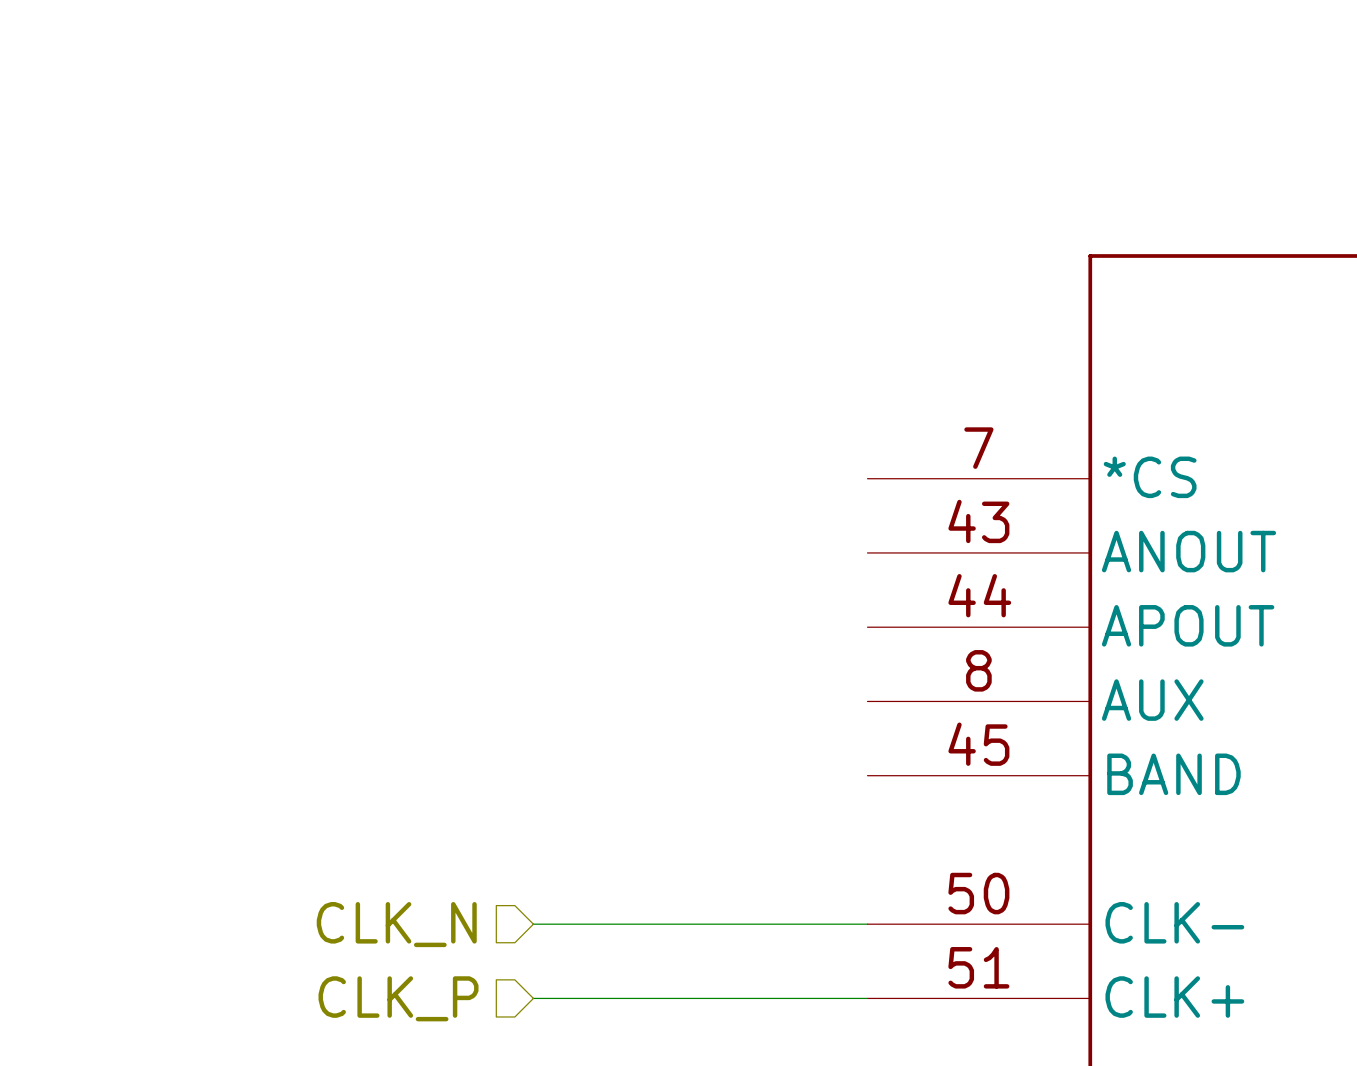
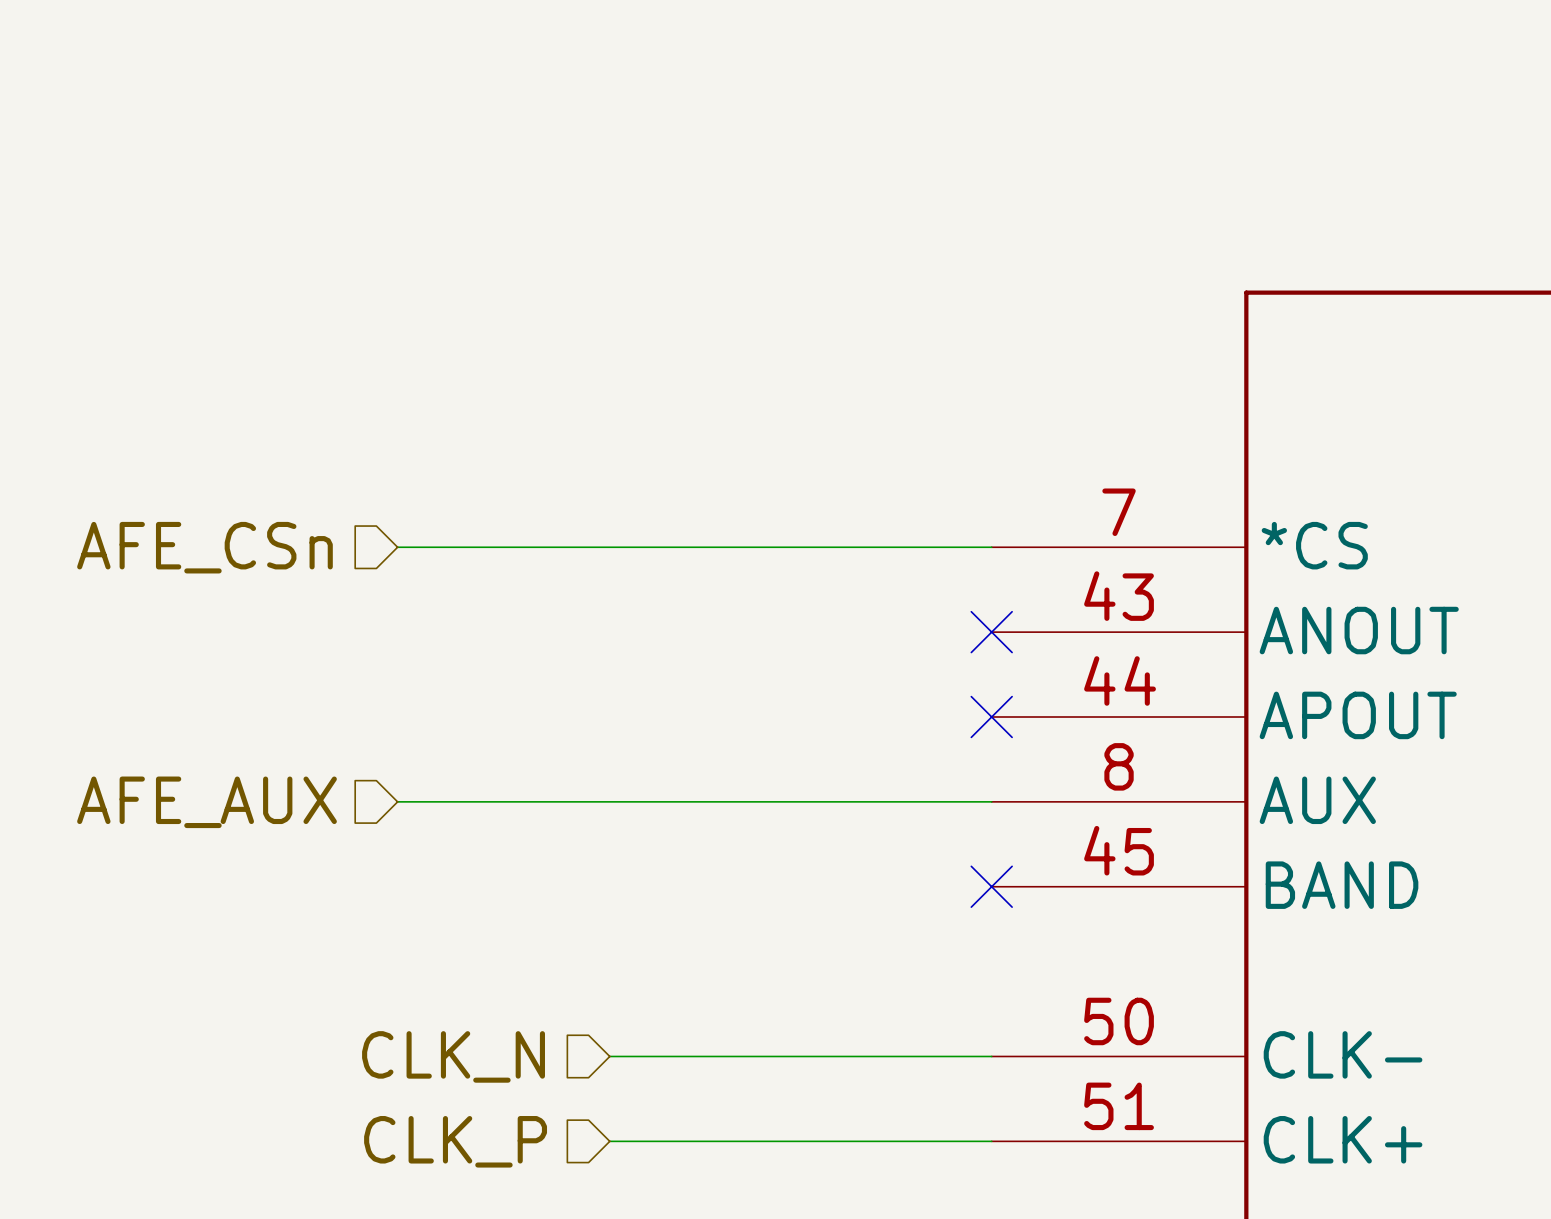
wire: none -> (397, 547) (991, 547)
hierarchical label: none -> AFE_CSn (204, 547)
no-connect mark: none -> (991, 632)
no-connect mark: none -> (991, 717)
hierarchical label: none -> AFE_AUX (207, 802)
wire: none -> (397, 801) (991, 801)
no-connect mark: none -> (991, 886)

